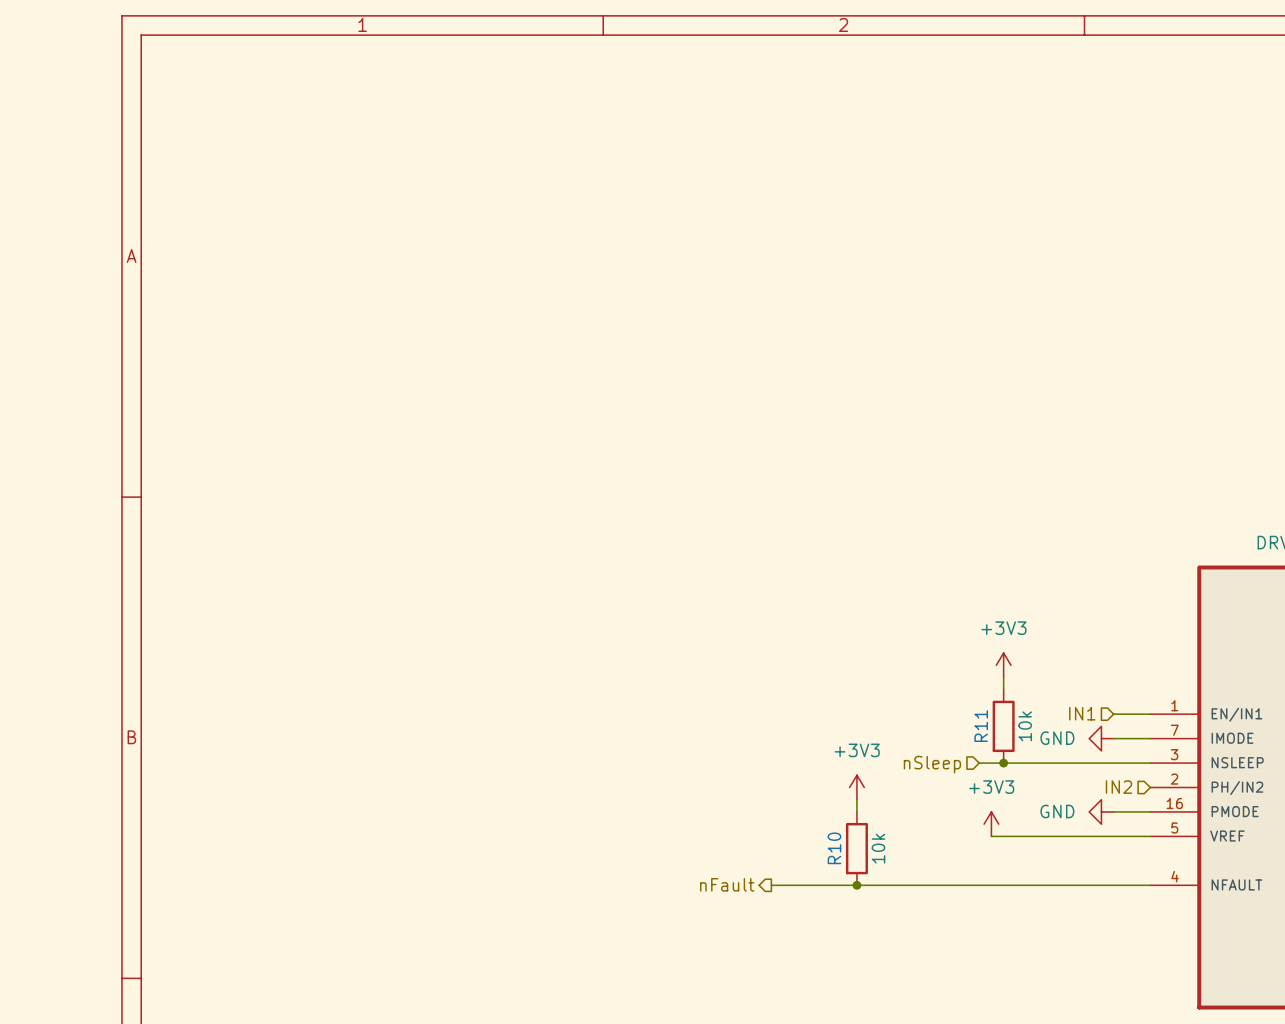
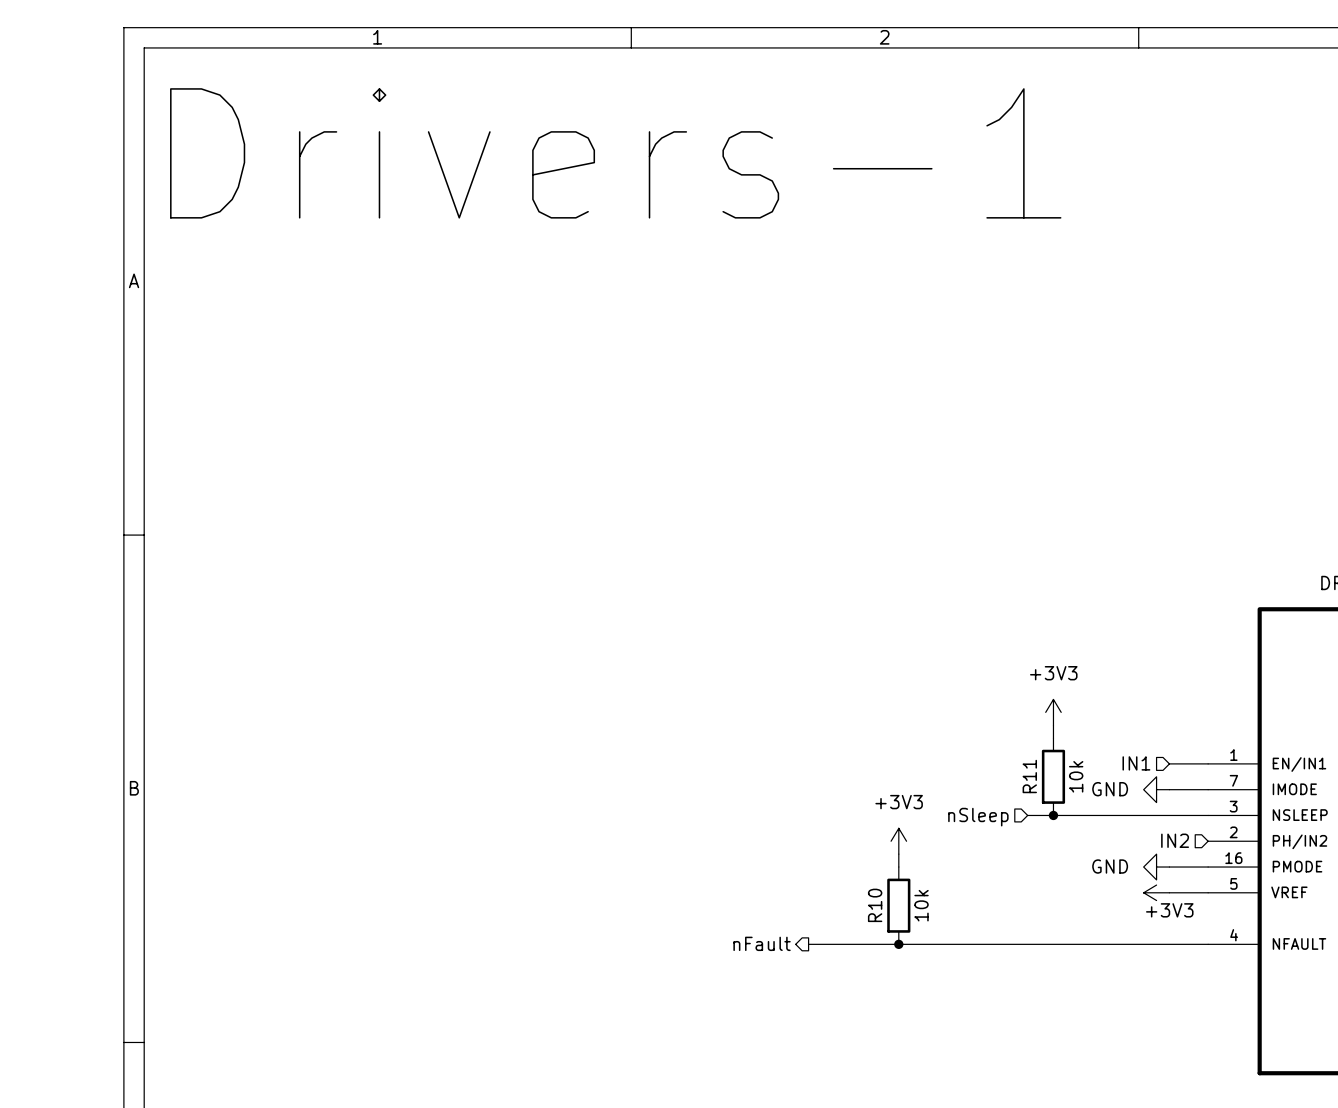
text: none -> Drivers-1 (615, 153)
power symbol text position: +3V3 (991, 787) -> +3V3 (1169, 910)
power symbol rotation: 0° (991, 824) -> 90° counterclockwise (1156, 892)
power symbol position: +3V3 (991, 824) -> +3V3 (1156, 892)
wire: (991, 836) (1113, 836) -> none

